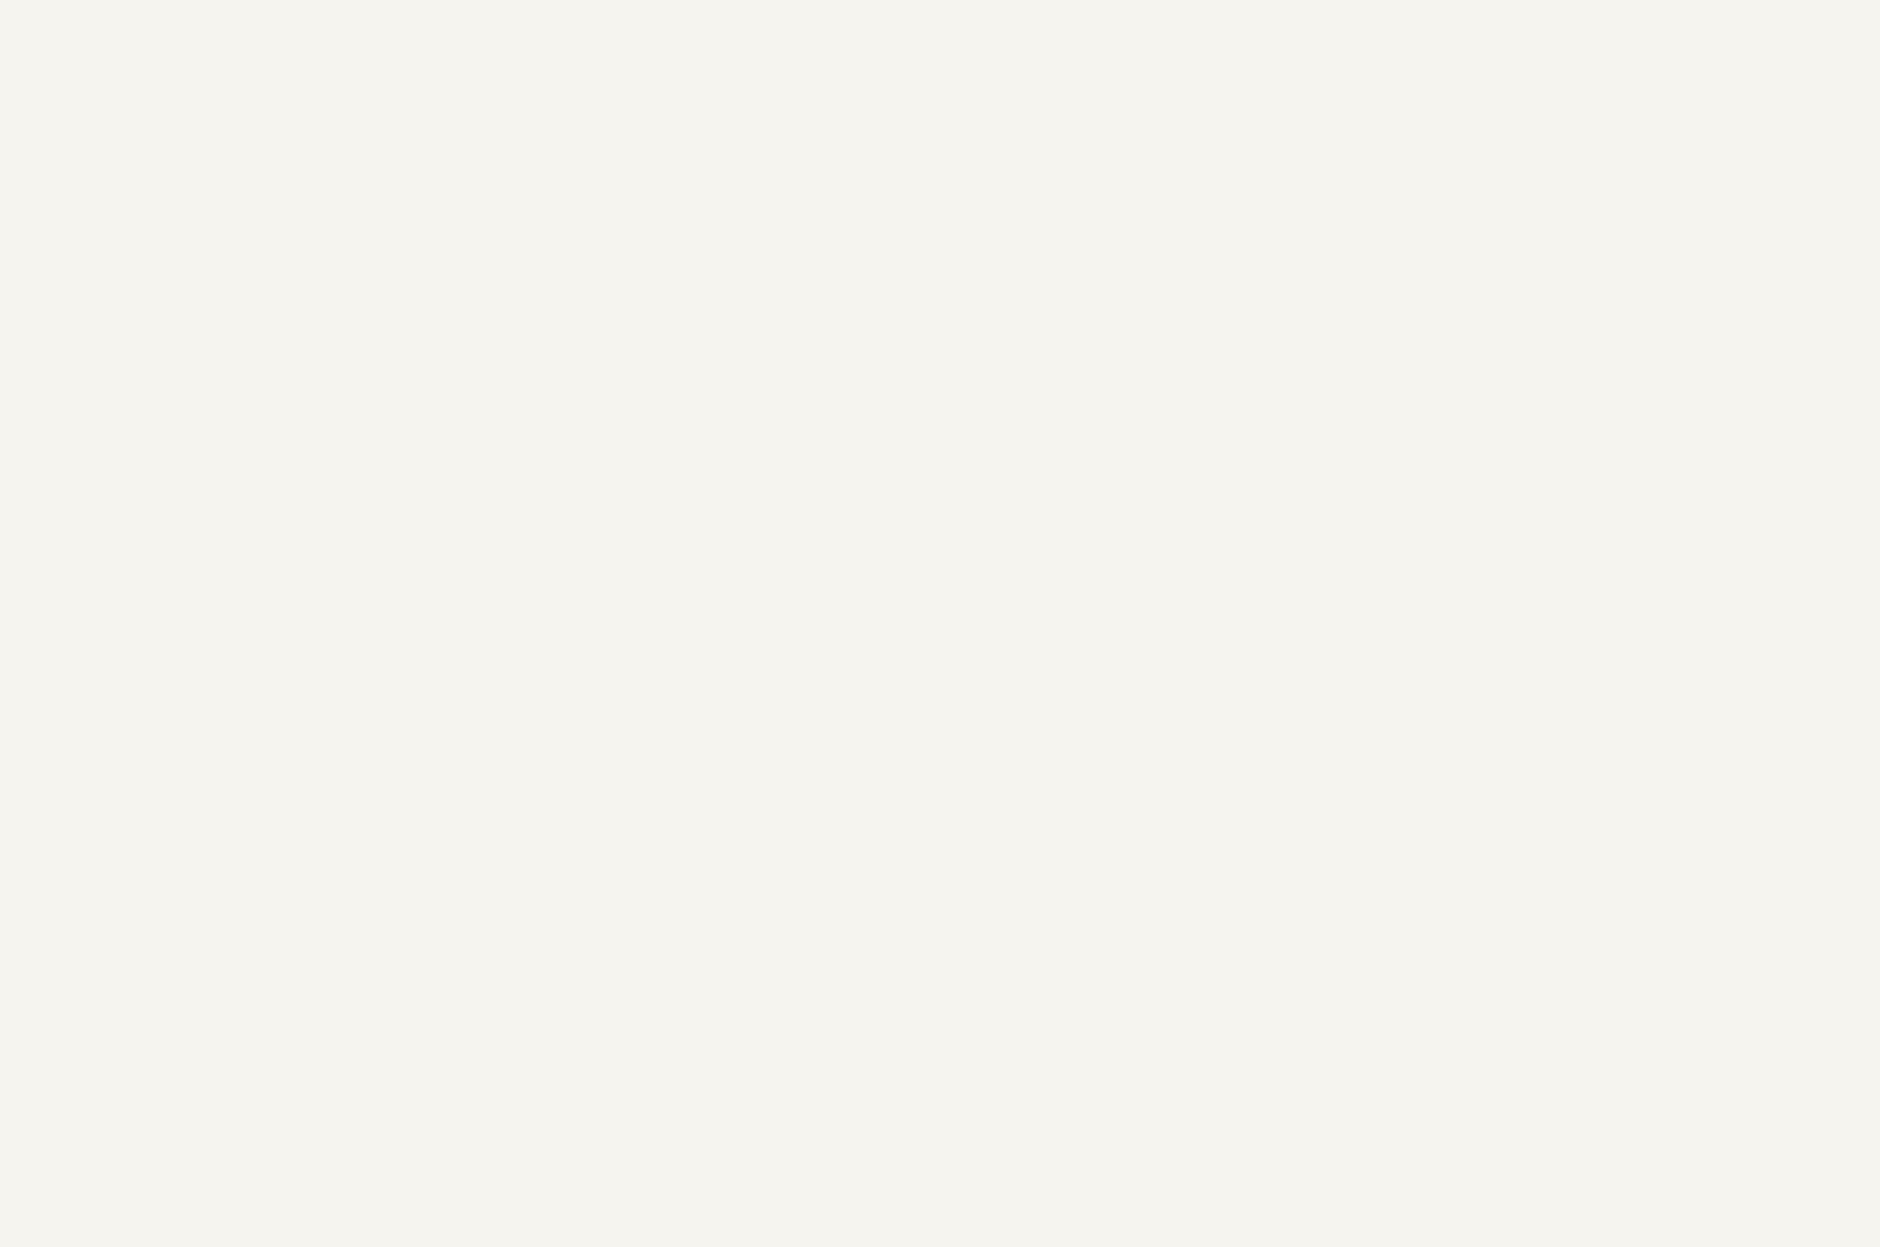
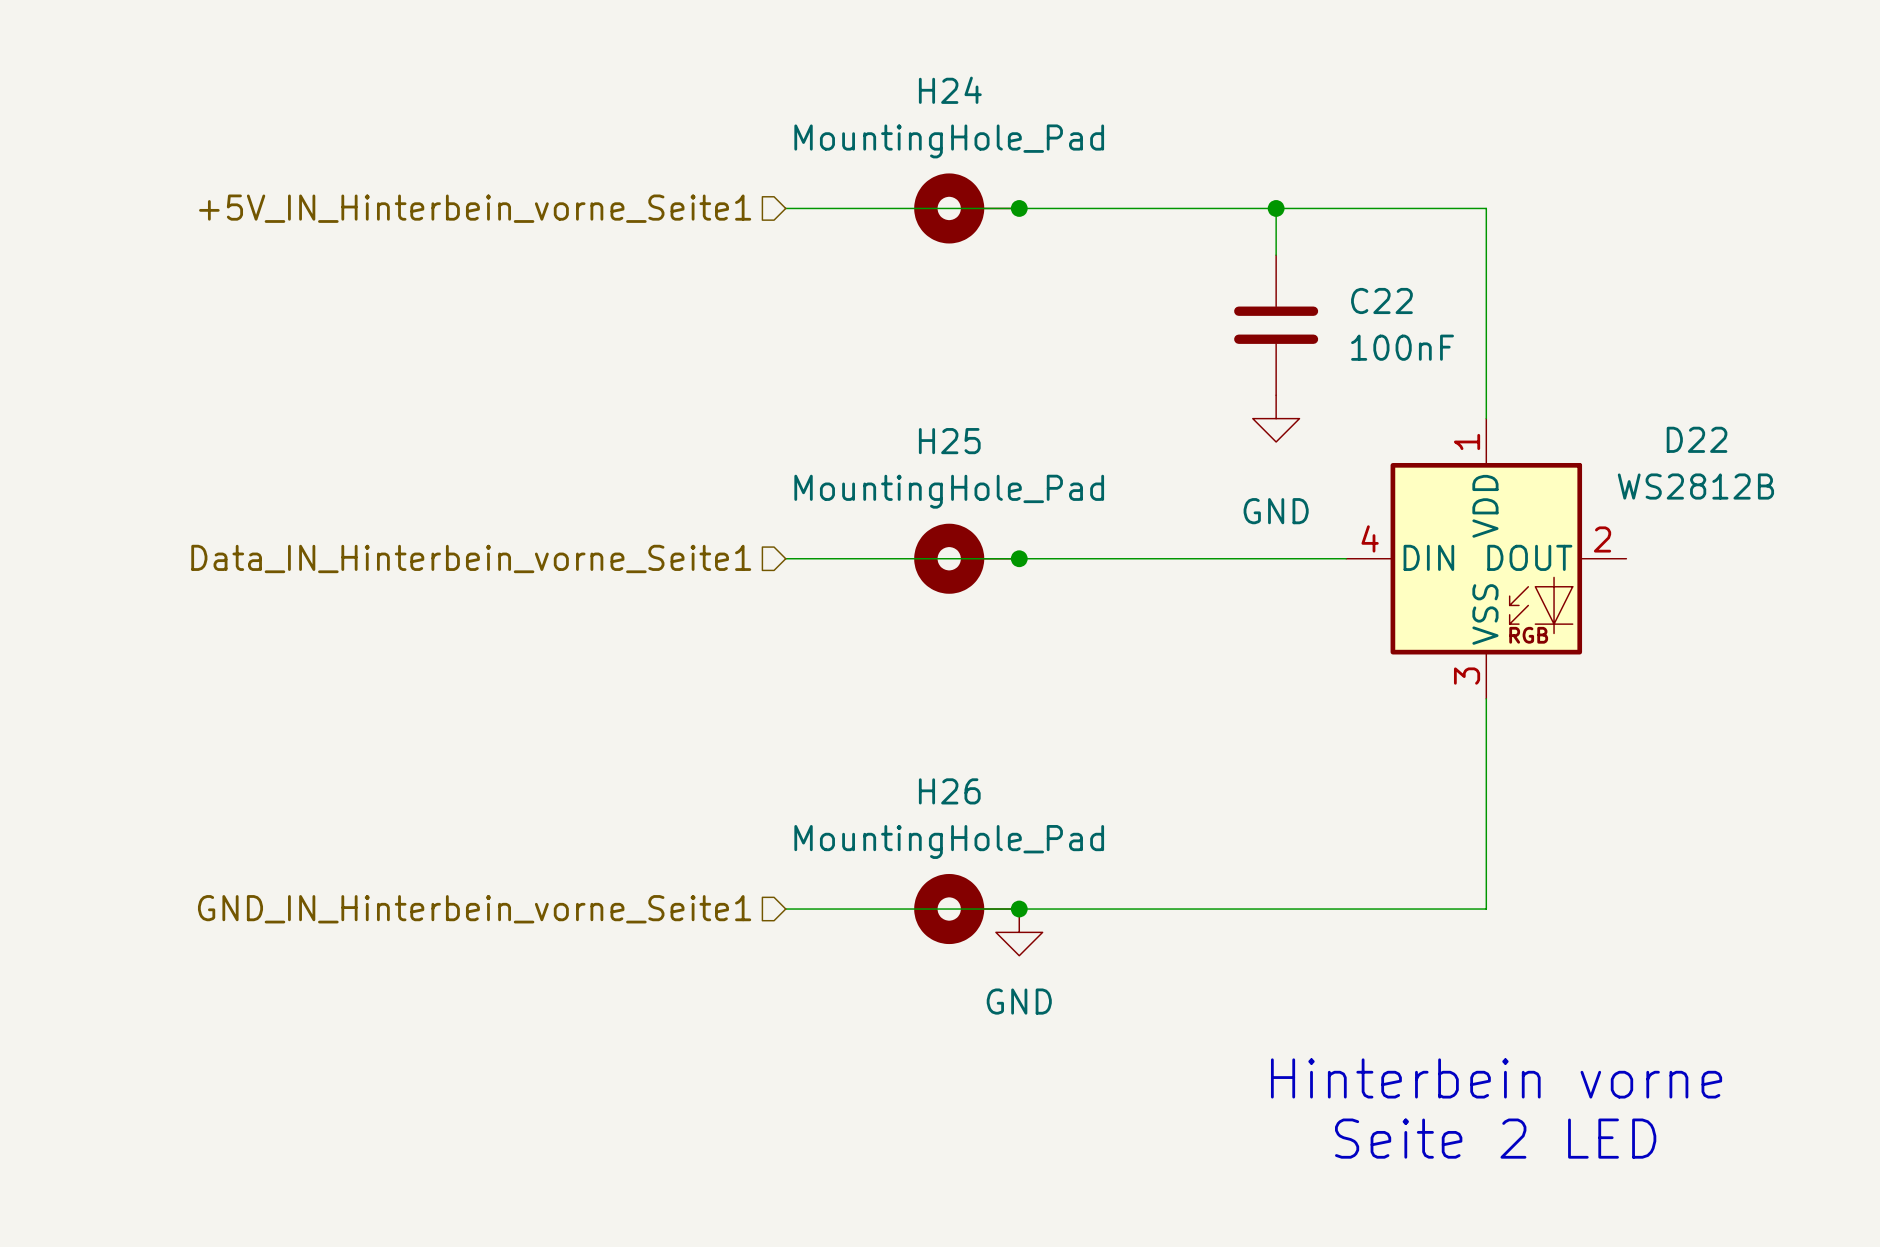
hierarchical label: none -> +5V_IN_Hinterbein_vorne_Seite1 (475, 208)
wire: none -> (785, 208) (1486, 208) (1486, 418)
H24: none -> MountingHole_Pad (966, 208)
junction: none -> (1019, 208)
wire: none -> (1276, 208) (1276, 255)
junction: none -> (1276, 208)
C22: none -> 100nF (1276, 325)
power symbol: none -> GND (1276, 418)
hierarchical label: none -> Data_IN_Hinterbein_vorne_Seite1 (471, 558)
wire: none -> (785, 558) (1346, 558)
H25: none -> MountingHole_Pad (966, 558)
junction: none -> (1019, 558)
D22: none -> WS2812B (1486, 558)
wire: none -> (1486, 698) (1486, 909) (785, 909)
hierarchical label: none -> GND_IN_Hinterbein_vorne_Seite1 (474, 909)
H26: none -> MountingHole_Pad (966, 909)
junction: none -> (1019, 909)
power symbol: none -> GND (1019, 932)
text: none -> Hinterbein vorne (1496, 1078)
text: none -> Seite 2 LED (1495, 1138)

